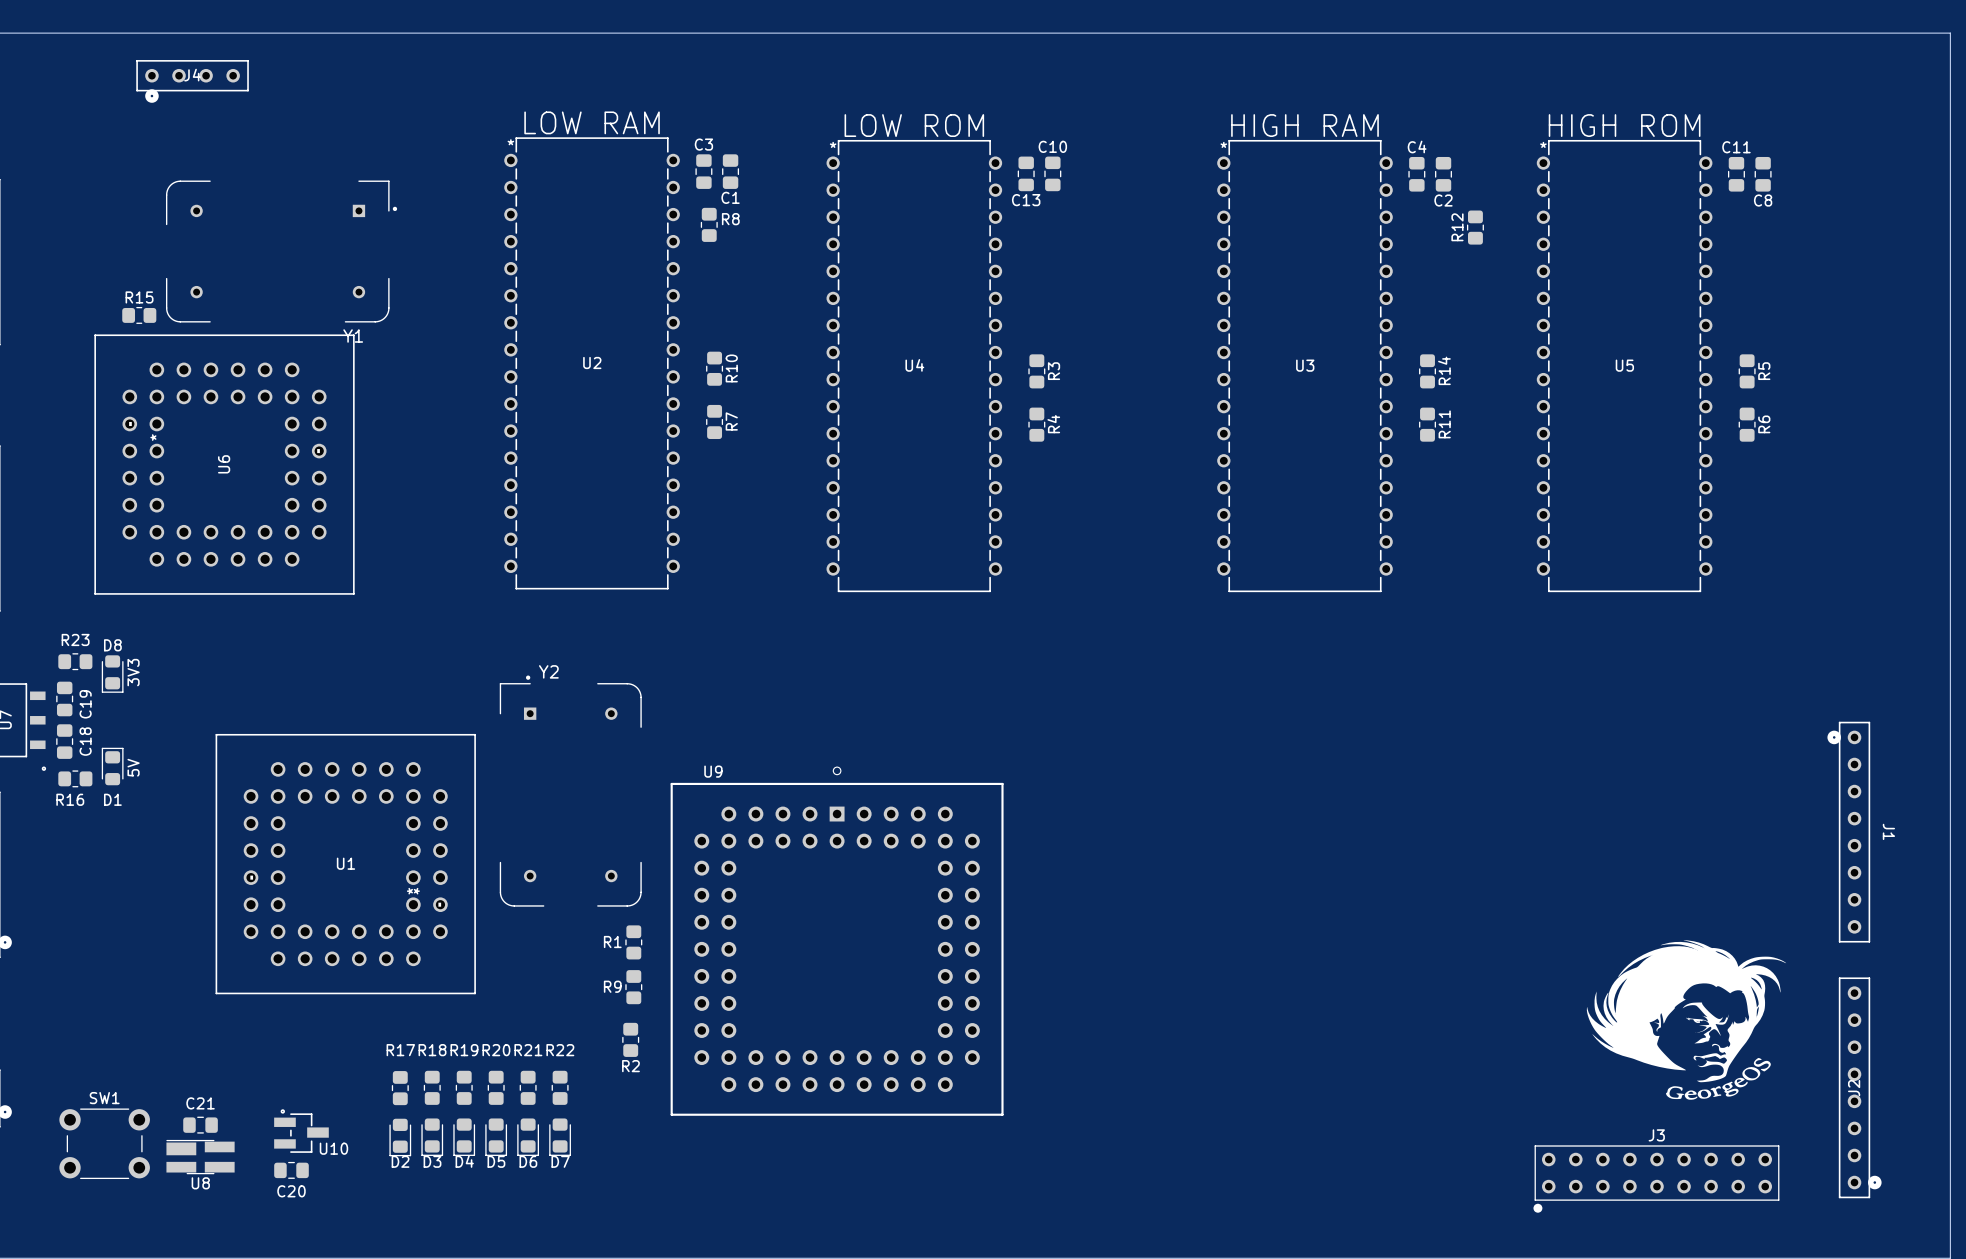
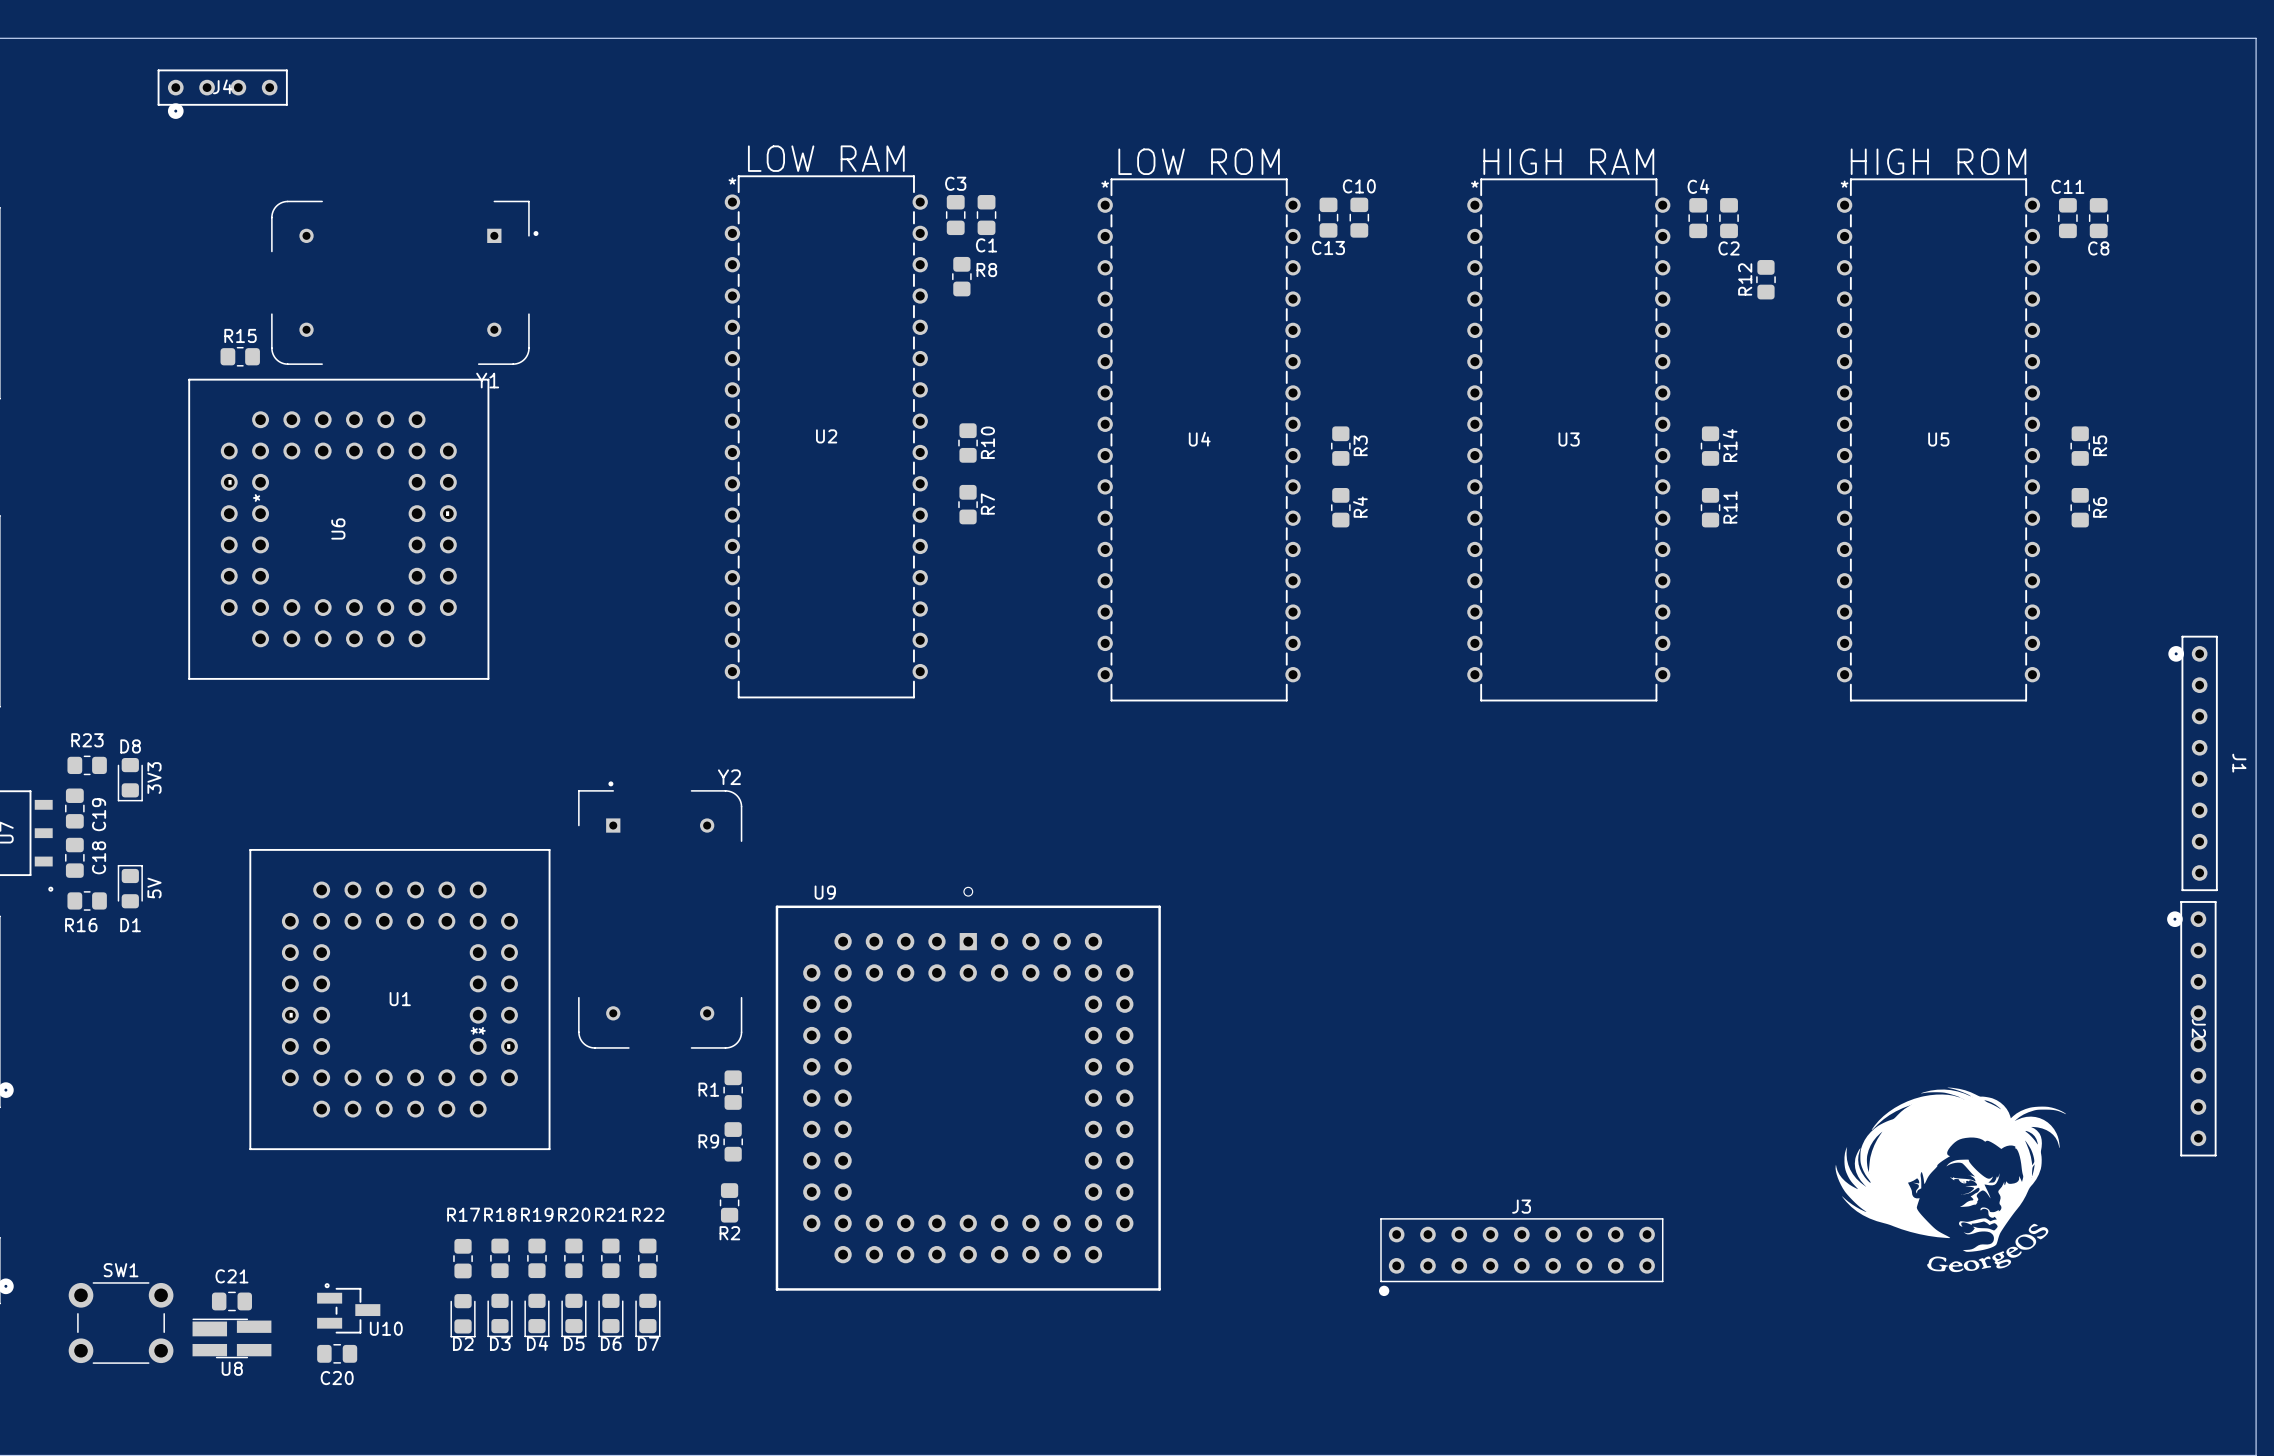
text position: LOW RAM (592, 122) -> LOW RAM (826, 158)
text position: LOW ROM (914, 125) -> LOW ROM (1199, 161)
text position: HIGH RAM (1304, 125) -> HIGH RAM (1568, 161)
text position: HIGH ROM (1624, 125) -> HIGH ROM (1938, 161)
C3 position: (703, 171) -> (955, 215)
C1 position: (730, 171) -> (986, 215)
C13 position: (1026, 173) -> (1328, 217)
C10 position: (1052, 173) -> (1359, 217)
C4 position: (1416, 174) -> (1698, 218)
C2 position: (1443, 174) -> (1729, 218)
C11 position: (1736, 174) -> (2067, 218)
C8 position: (1763, 174) -> (2098, 218)
R8 position: (709, 224) -> (961, 276)
R12 position: (1475, 227) -> (1765, 279)
Y1 position: (281, 251) -> (404, 282)
R15 position: (139, 315) -> (240, 356)
U2 position: (592, 363) -> (826, 436)
U4 position: (914, 366) -> (1199, 439)
U3 position: (1304, 366) -> (1568, 439)
U5 position: (1624, 366) -> (1938, 439)
R10 position: (714, 368) -> (968, 443)
R3 position: (1036, 371) -> (1340, 446)
R14 position: (1427, 371) -> (1710, 446)
R5 position: (1747, 371) -> (2080, 446)
R7 position: (714, 421) -> (968, 504)
R4 position: (1036, 424) -> (1340, 507)
R11 position: (1427, 424) -> (1710, 507)
R6 position: (1747, 424) -> (2080, 507)
U6 position: (224, 464) -> (338, 529)
Y2 name position: Y2 (548, 671) -> Y2 (729, 777)
J1 position: (1848, 832) -> (2193, 763)
J2 rotation: 0° (1860, 1087) -> 180° (2191, 1028)
J2 position: (1860, 1087) -> (2191, 1028)
J3 position: (1656, 1179) -> (1521, 1257)

